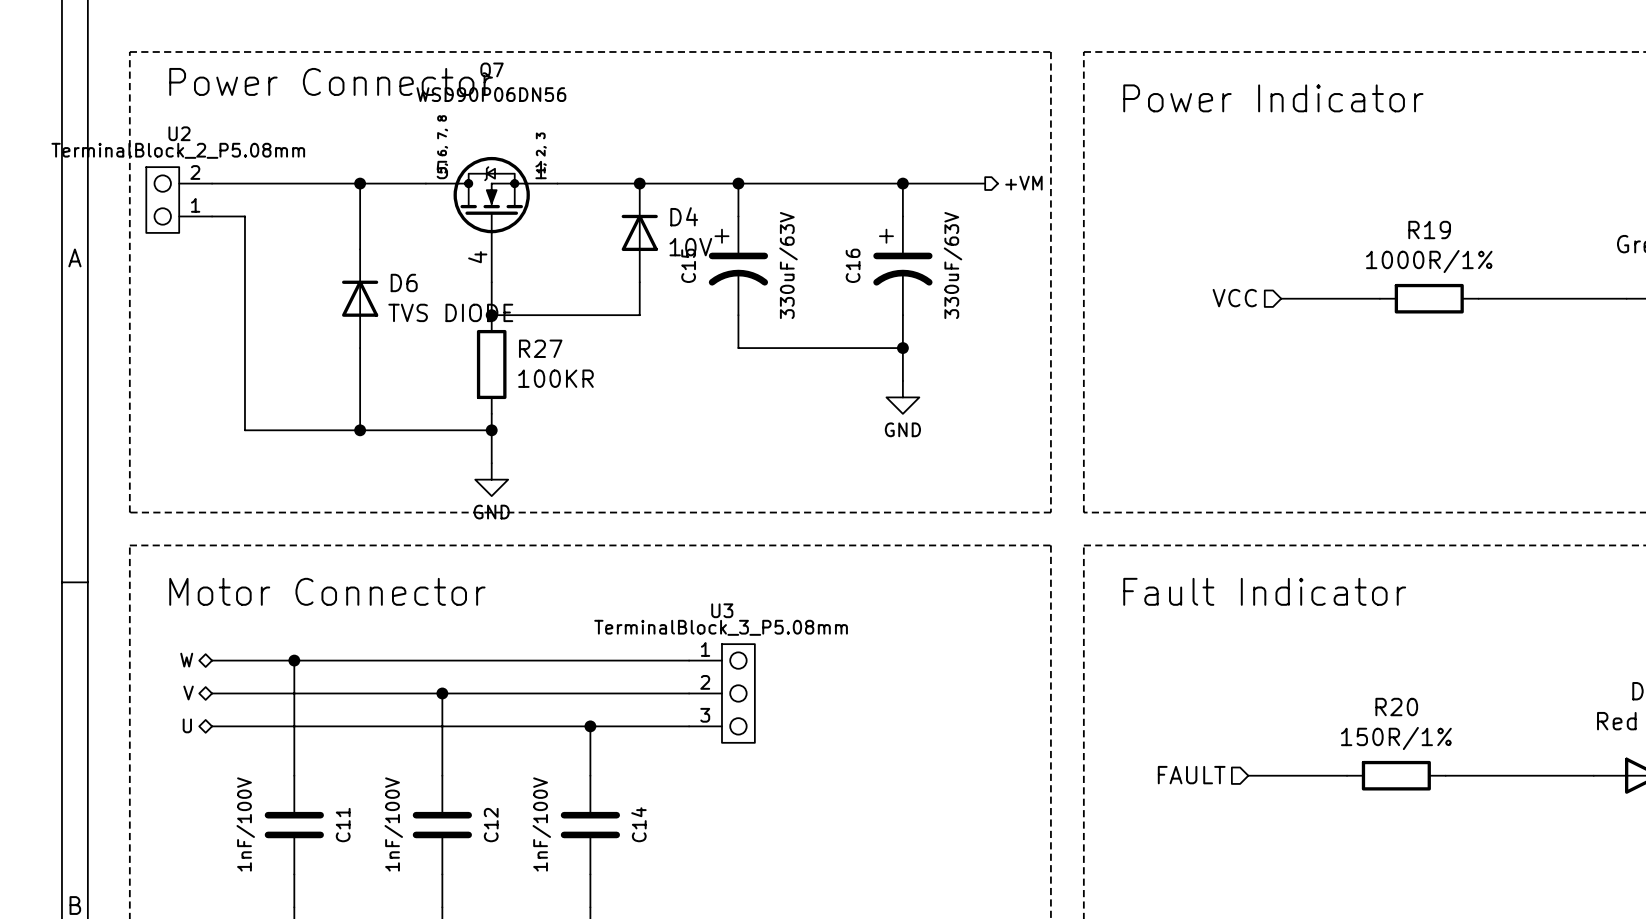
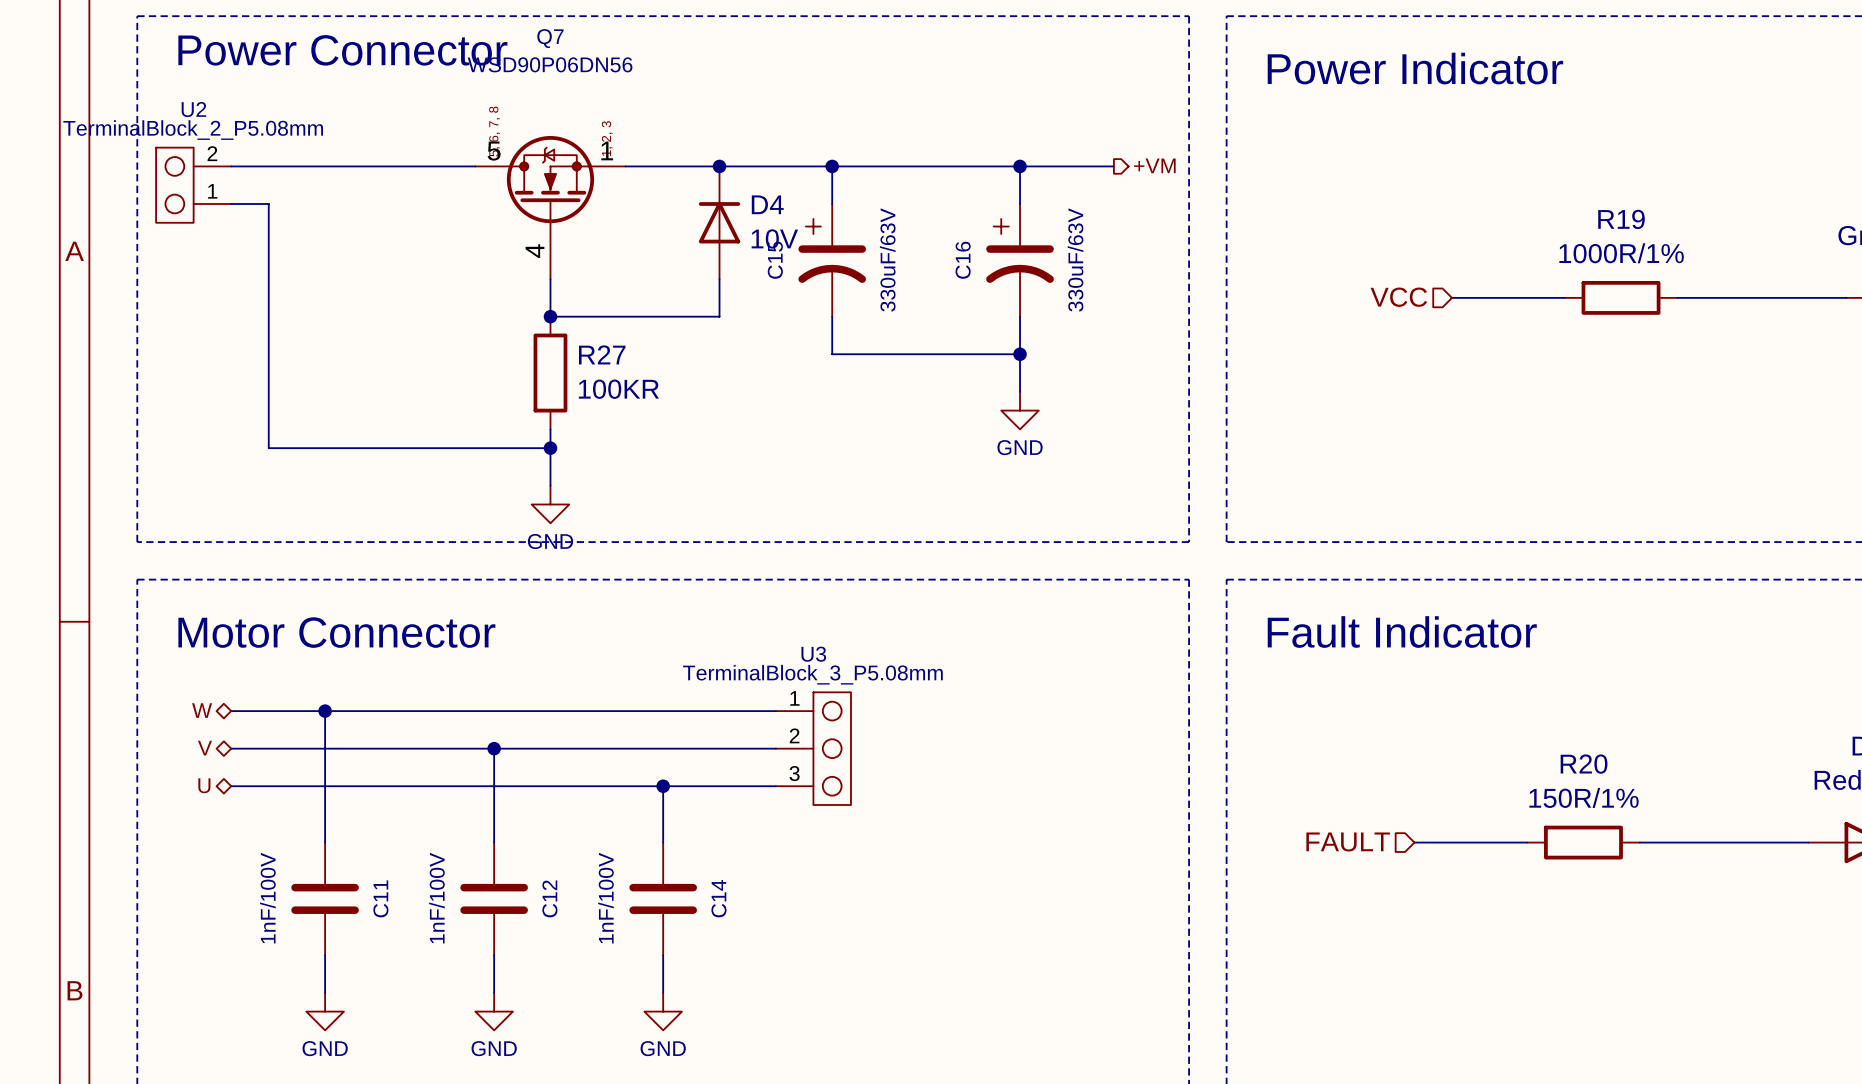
wire: (360, 183) (360, 249) -> none
junction: (360, 183) -> none
D6: TVS DIODE (360, 298) -> none
wire: (360, 348) (360, 430) -> none
junction: (360, 430) -> none

